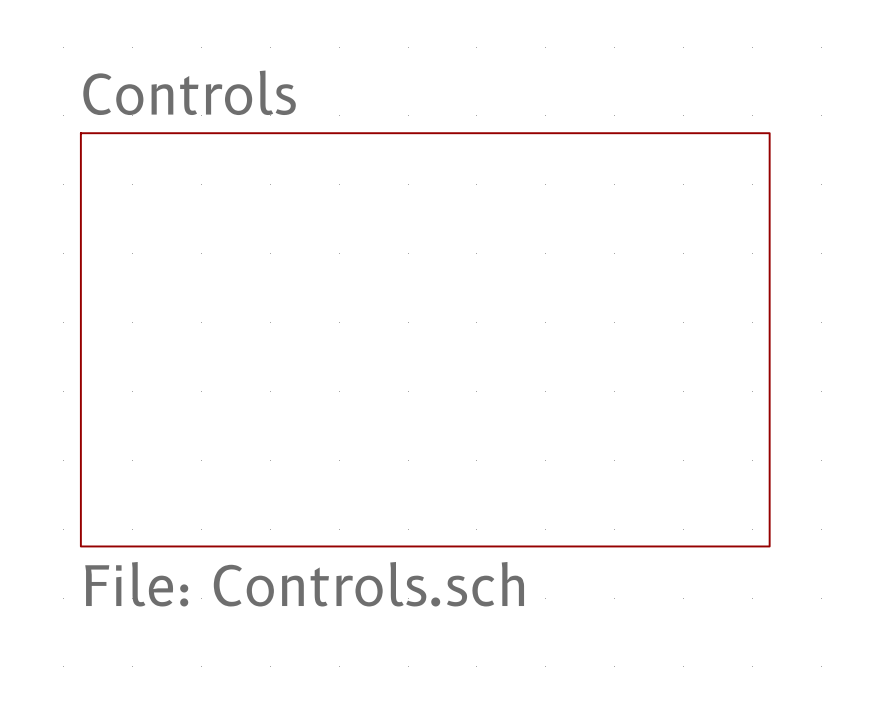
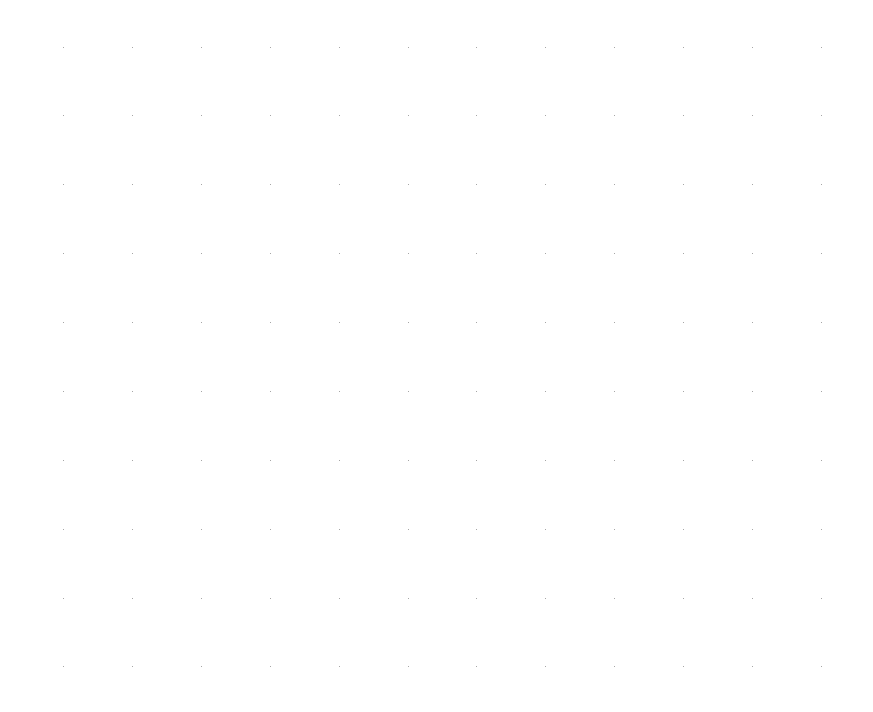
sheet Controls: File: Controls.sch (425, 339) -> none

